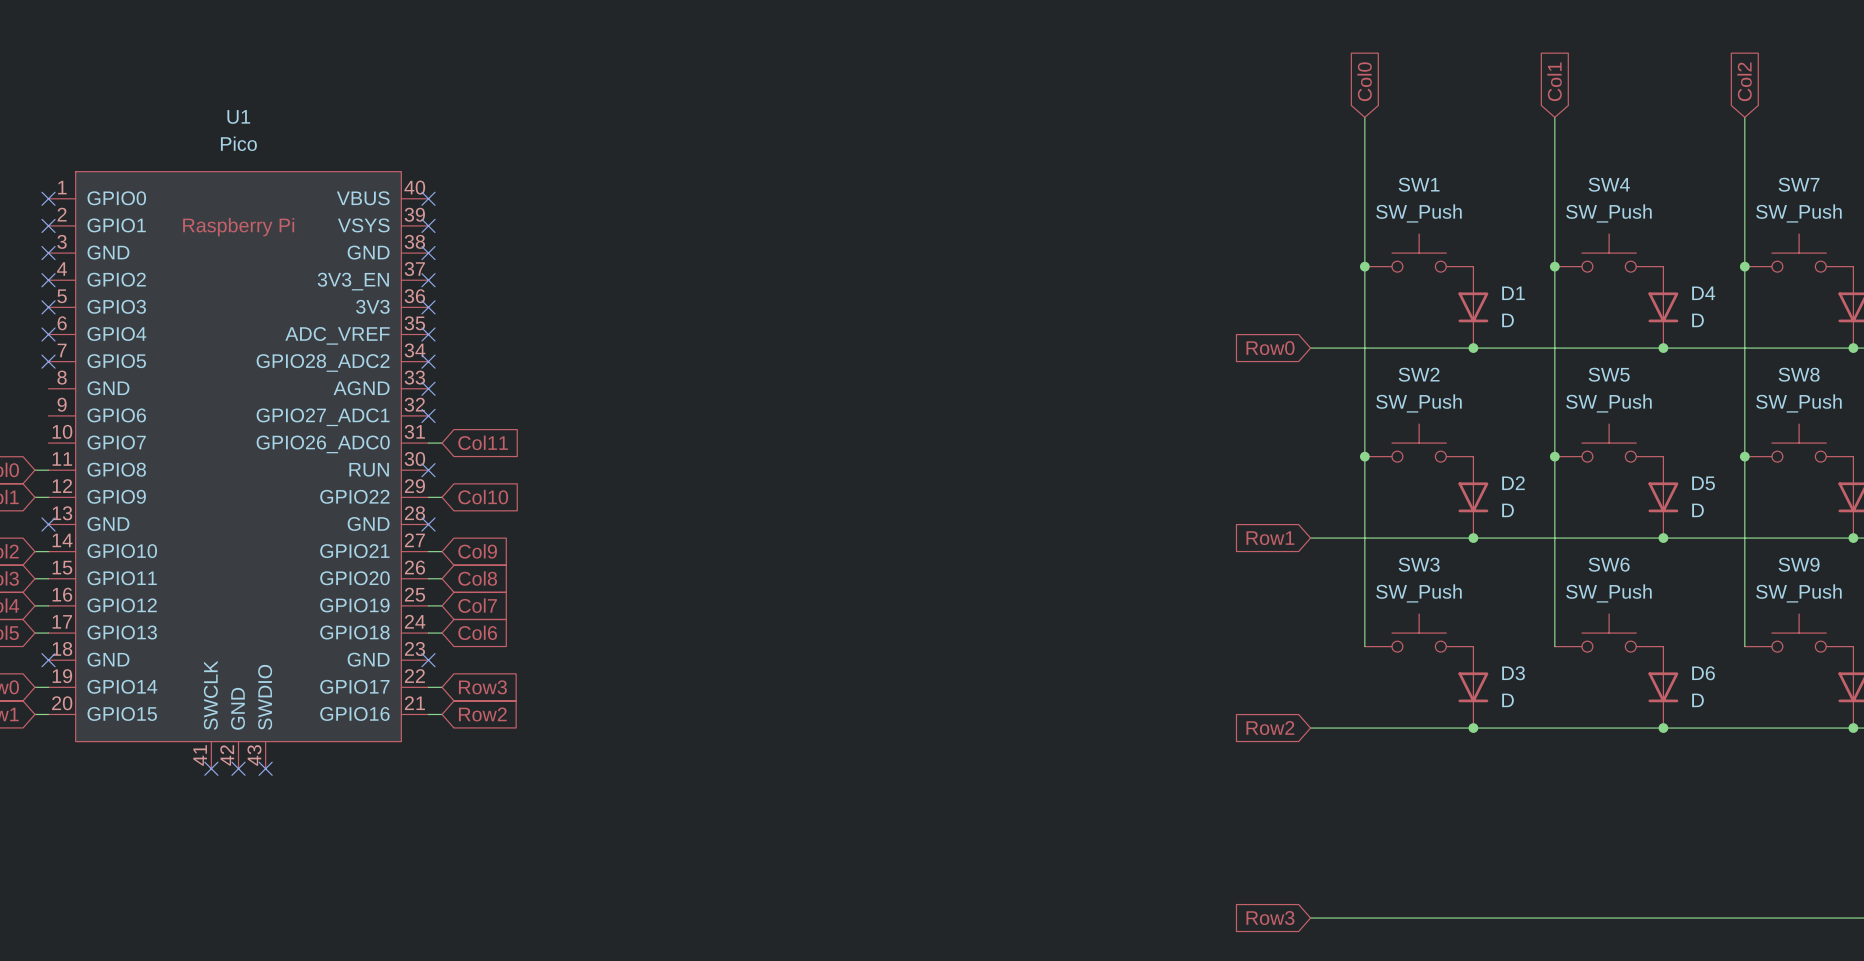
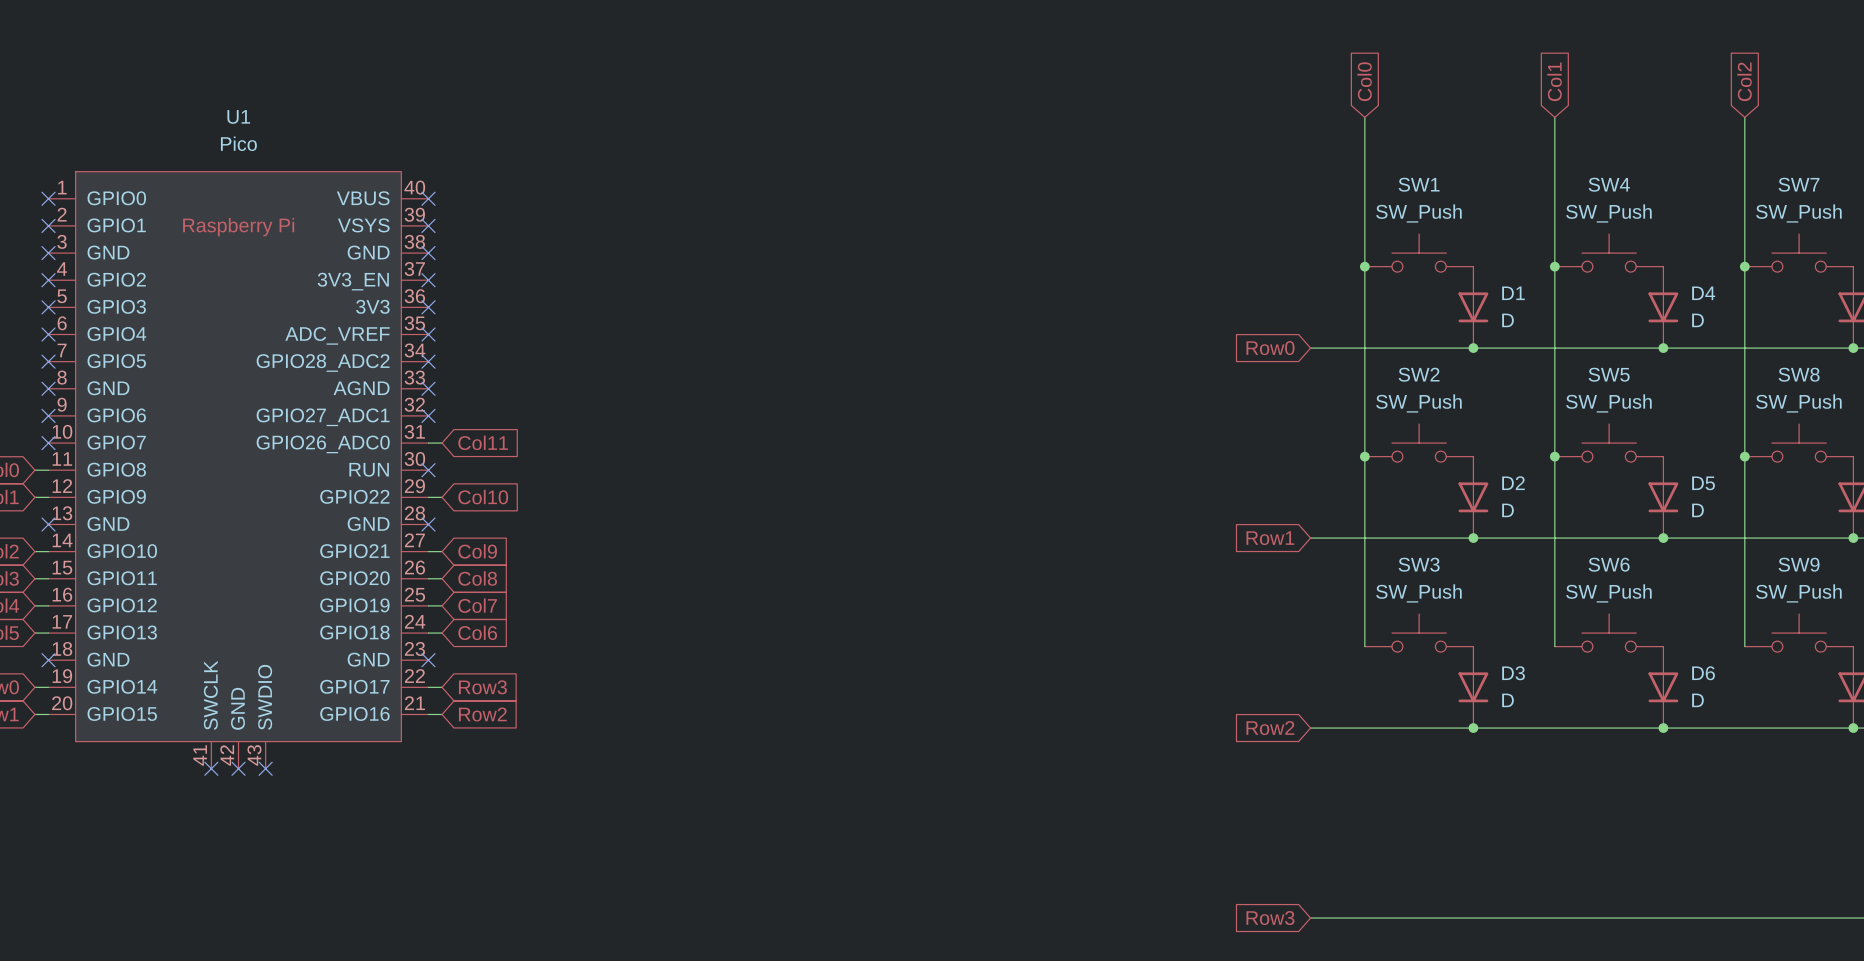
no-connect mark: none -> (48, 388)
no-connect mark: none -> (48, 415)
no-connect mark: none -> (48, 443)

